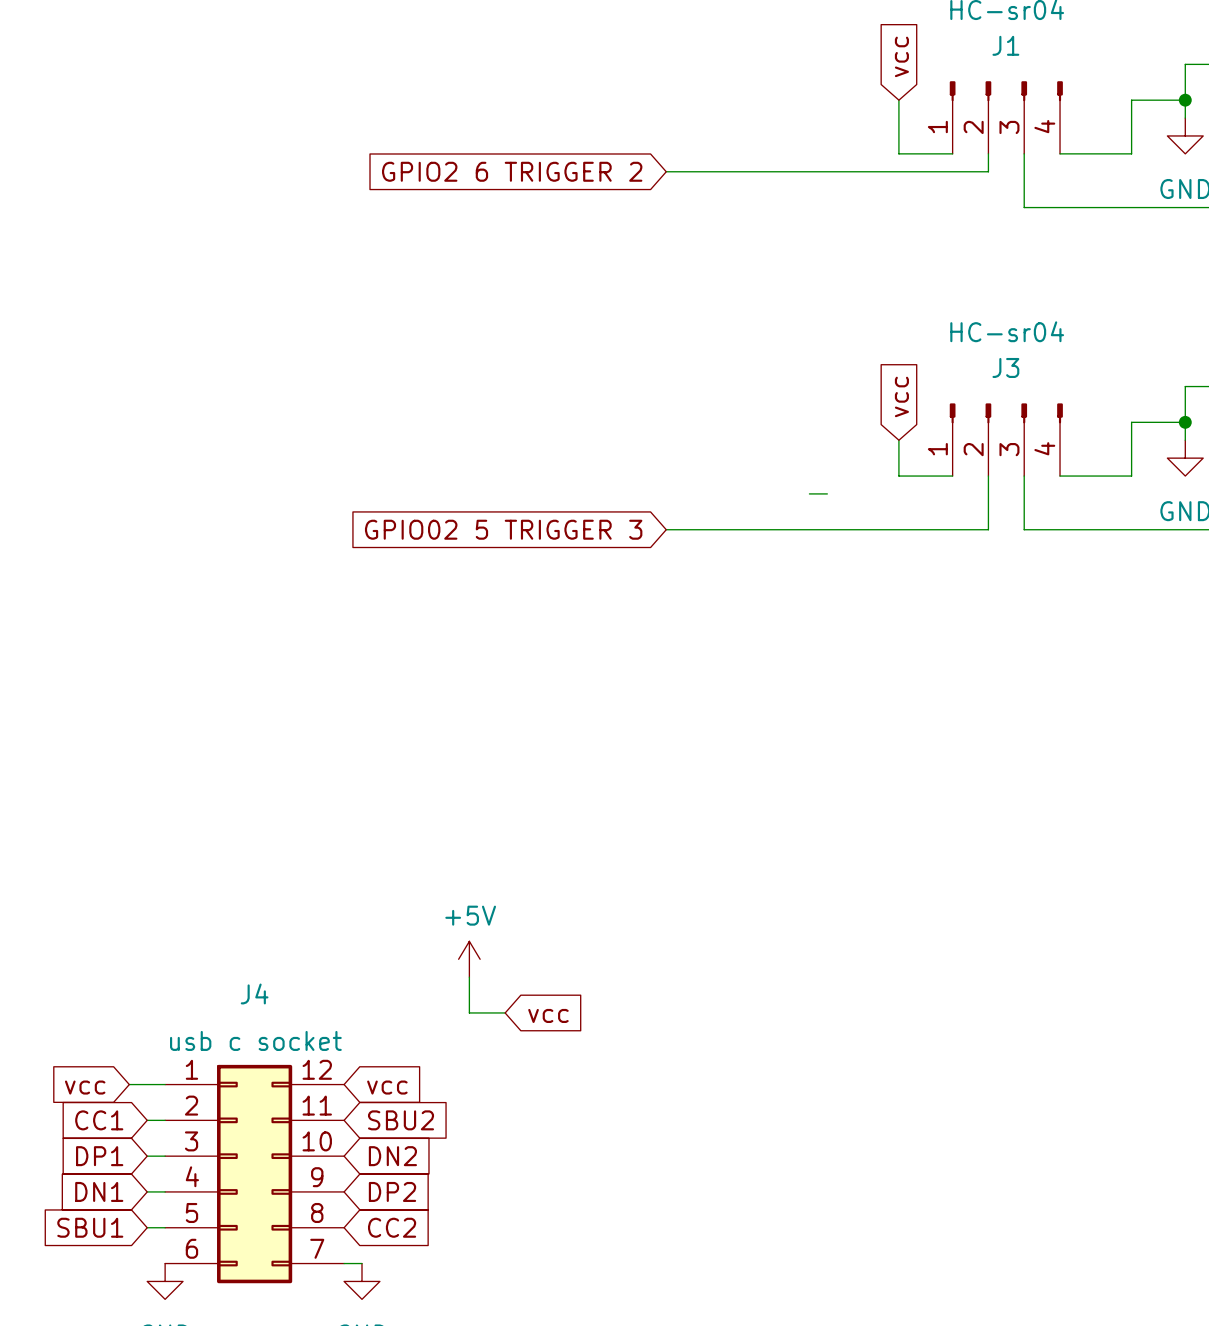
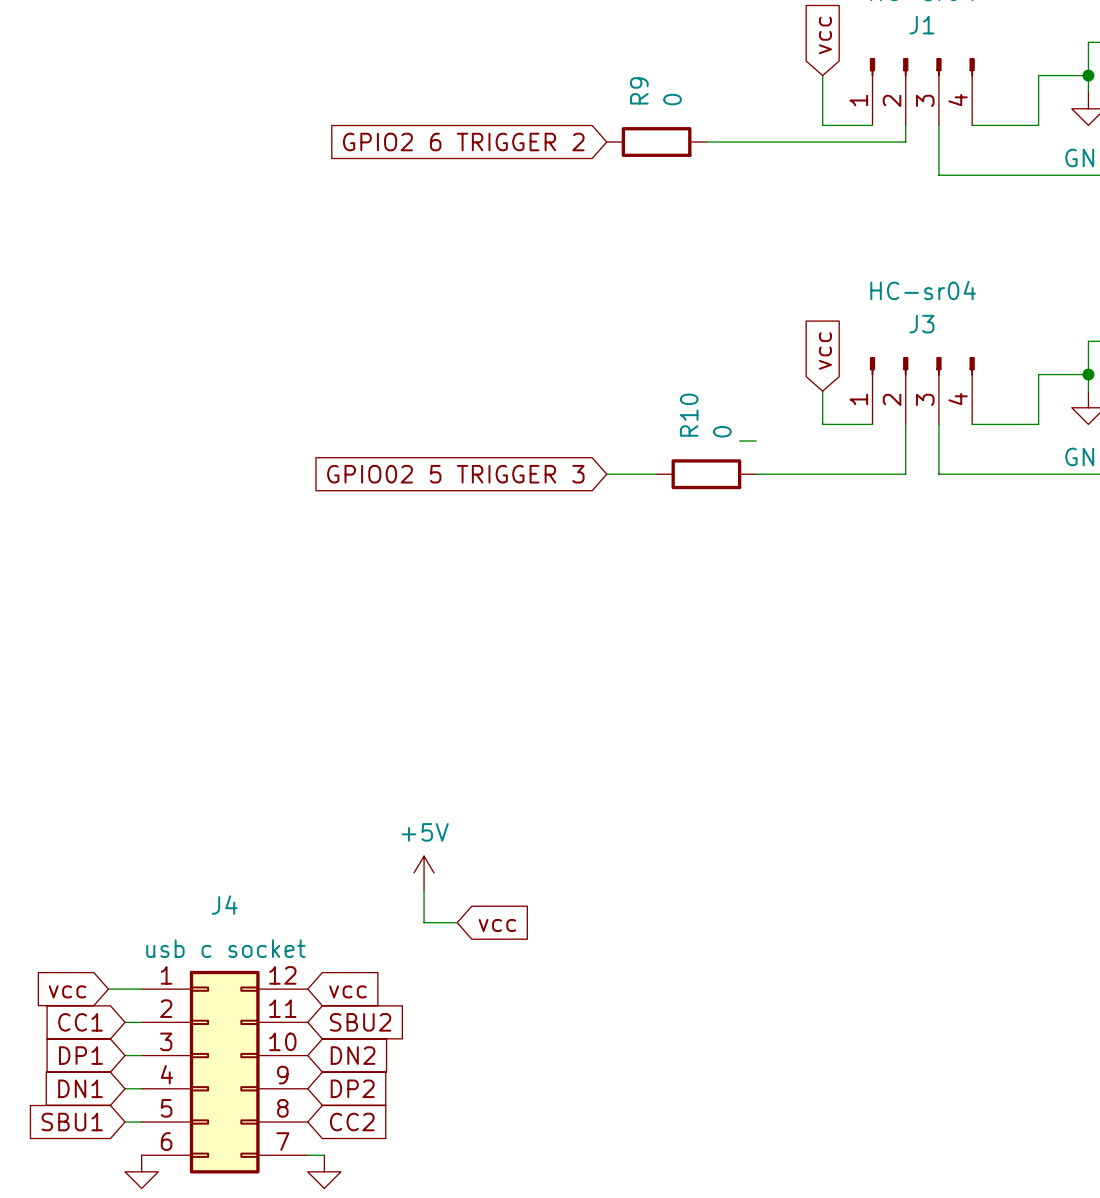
wire: (666, 171) (773, 171) -> none
R9: none -> 0 (656, 142)
wire: (719, 529) (827, 529) -> none
R10: none -> 0 (706, 474)

